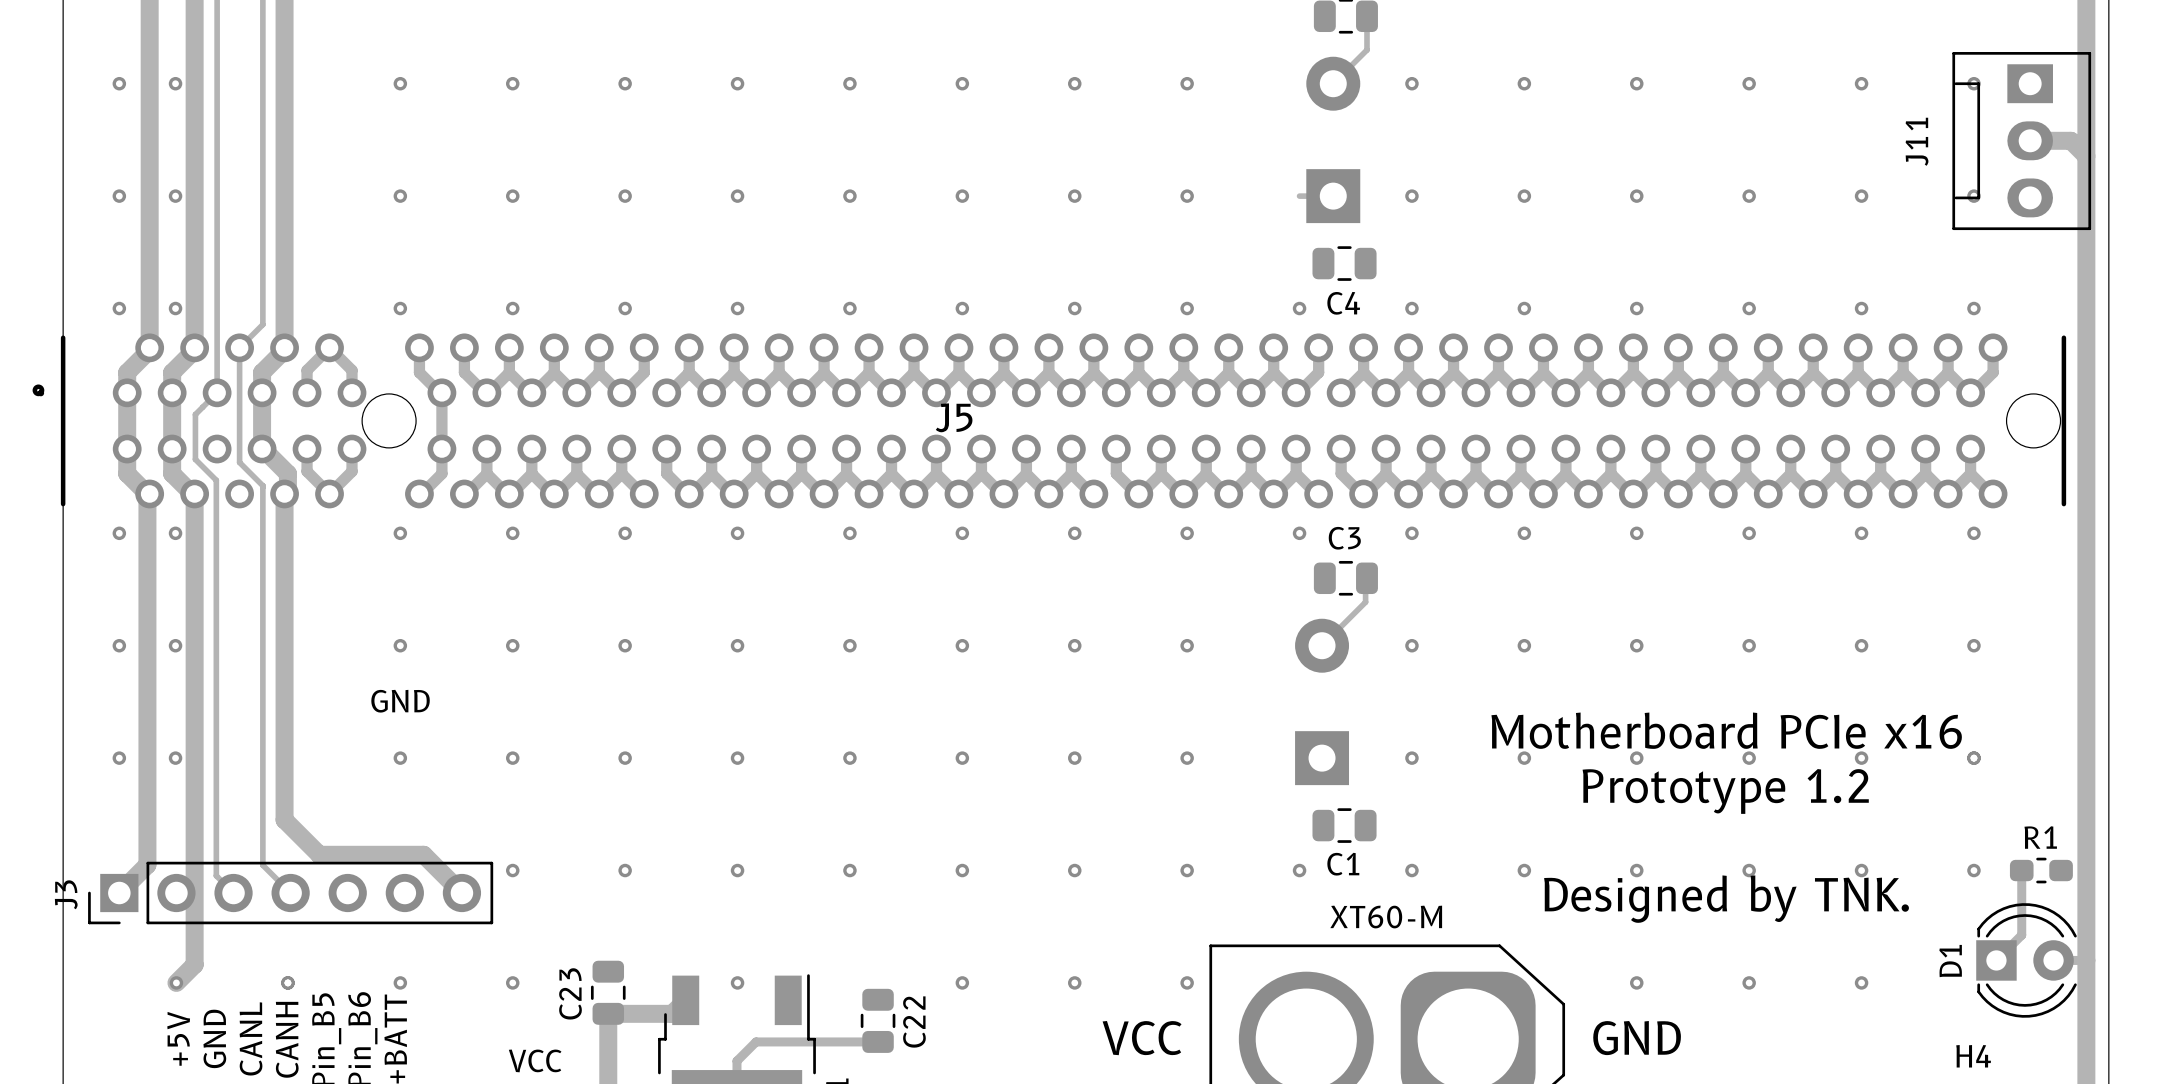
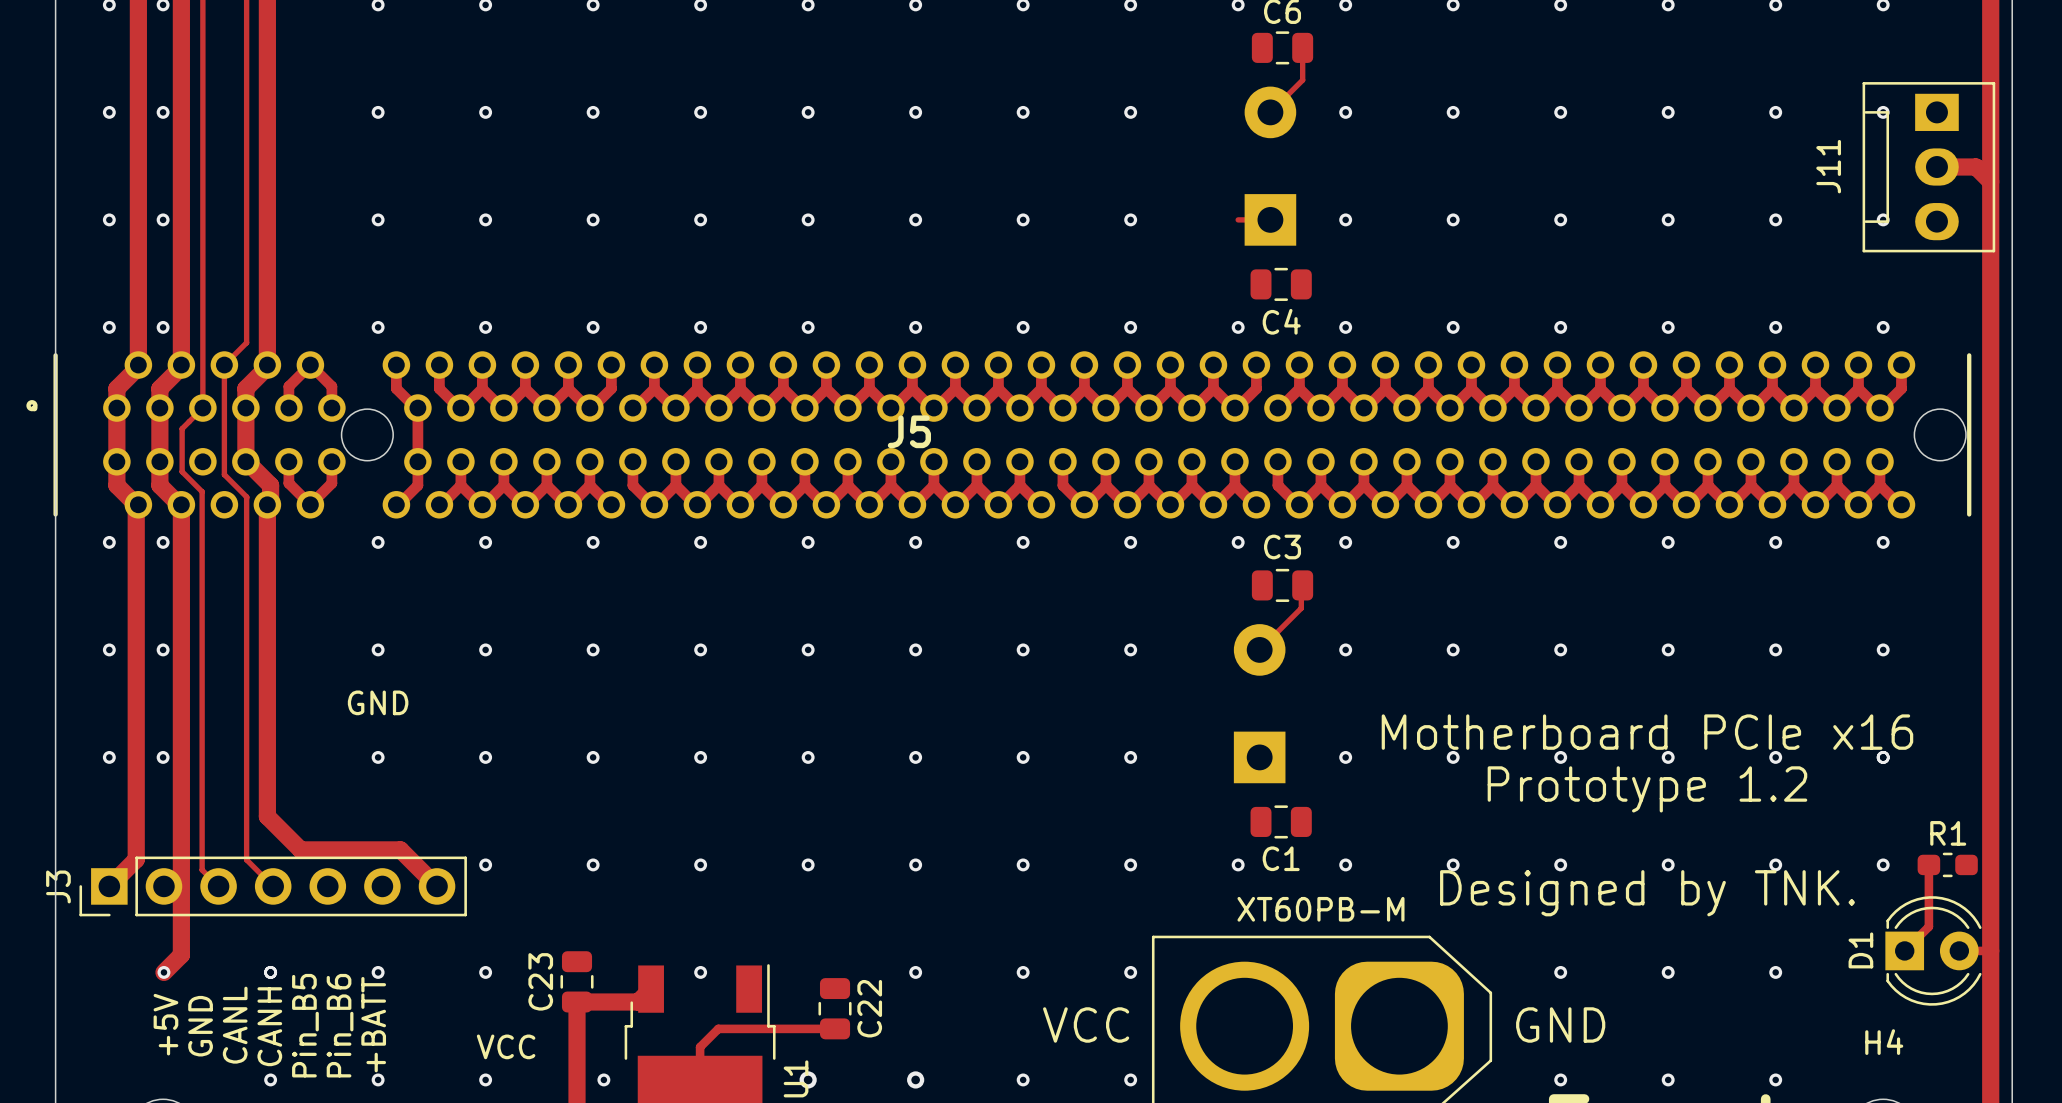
part value: XT60-M (1386, 917) -> XT60PB-M (1321, 909)

